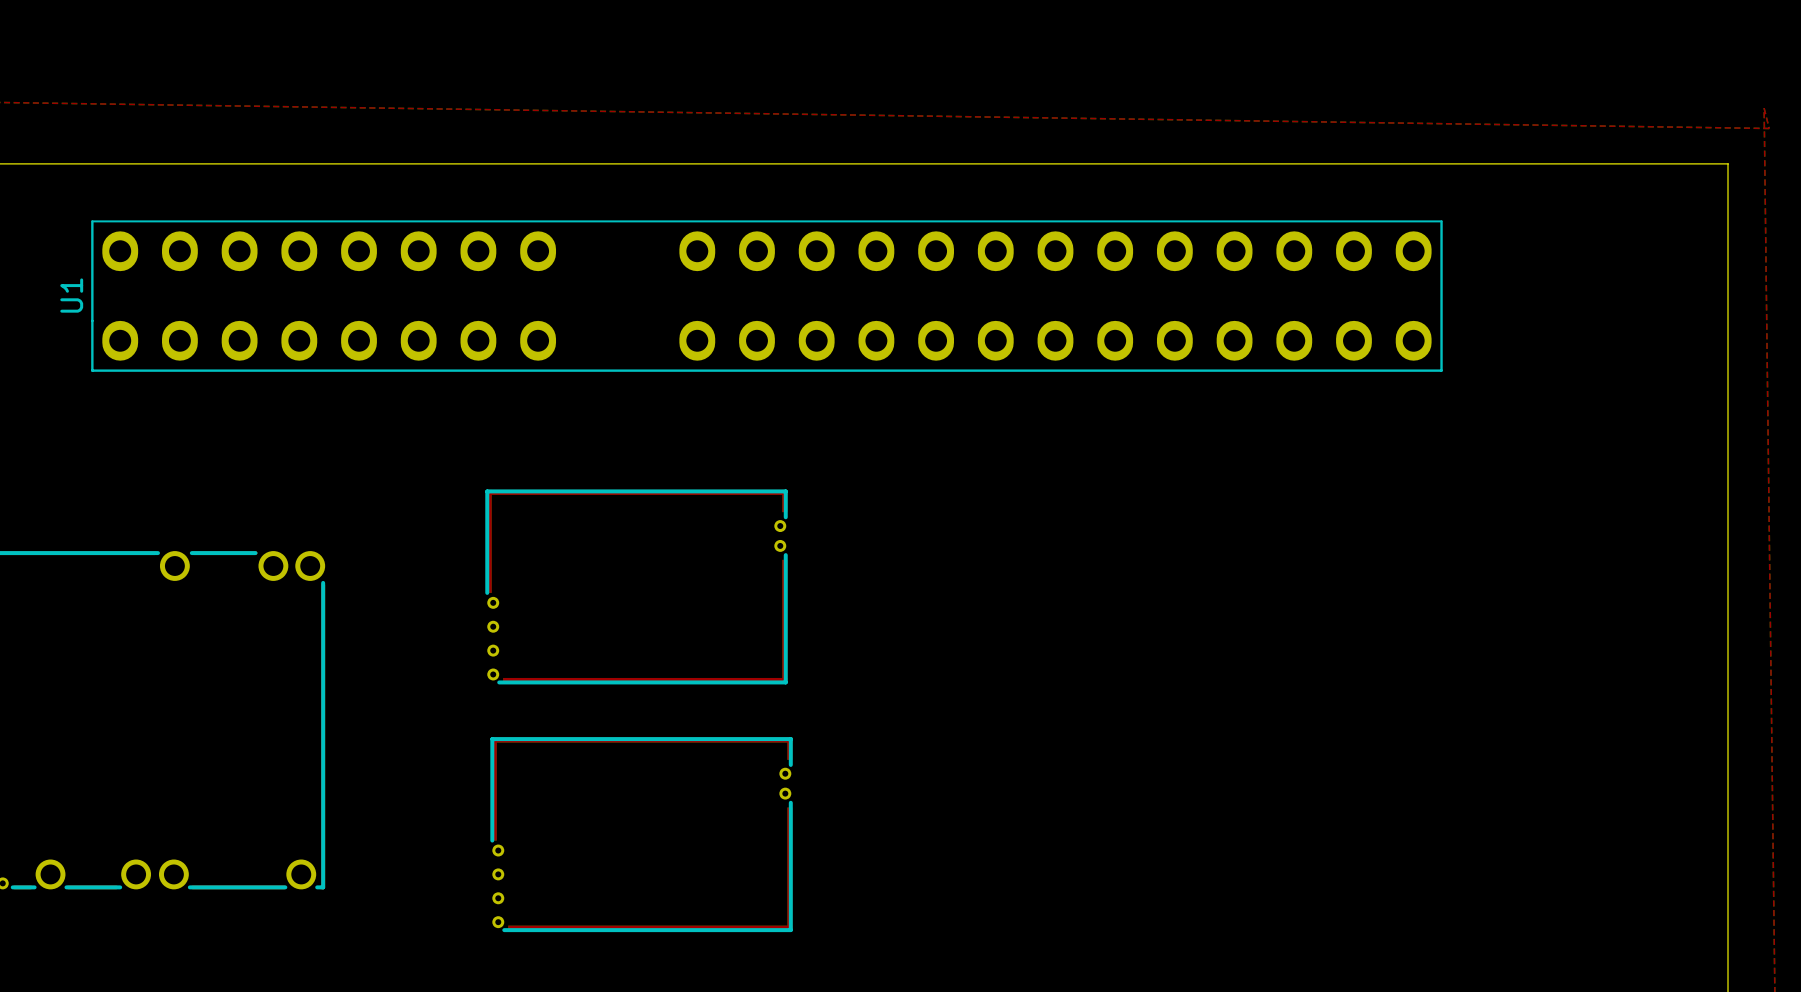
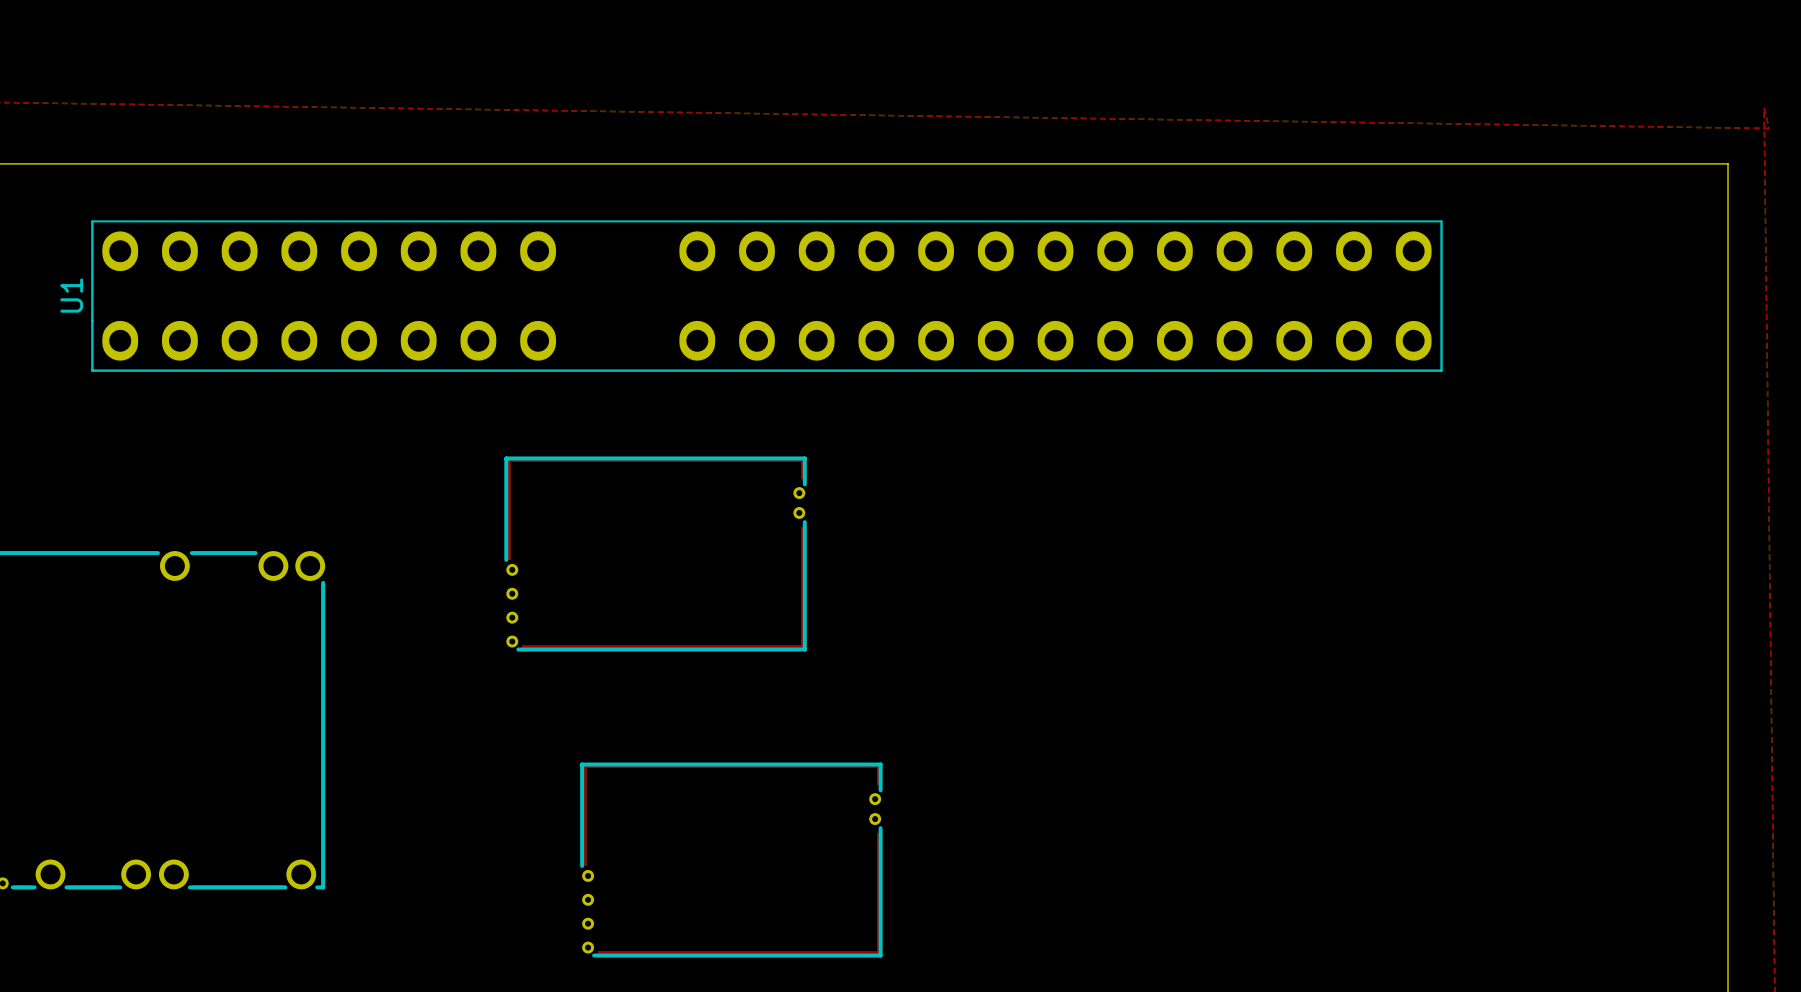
part position: (636, 586) -> (655, 553)
part position: (641, 834) -> (731, 860)

